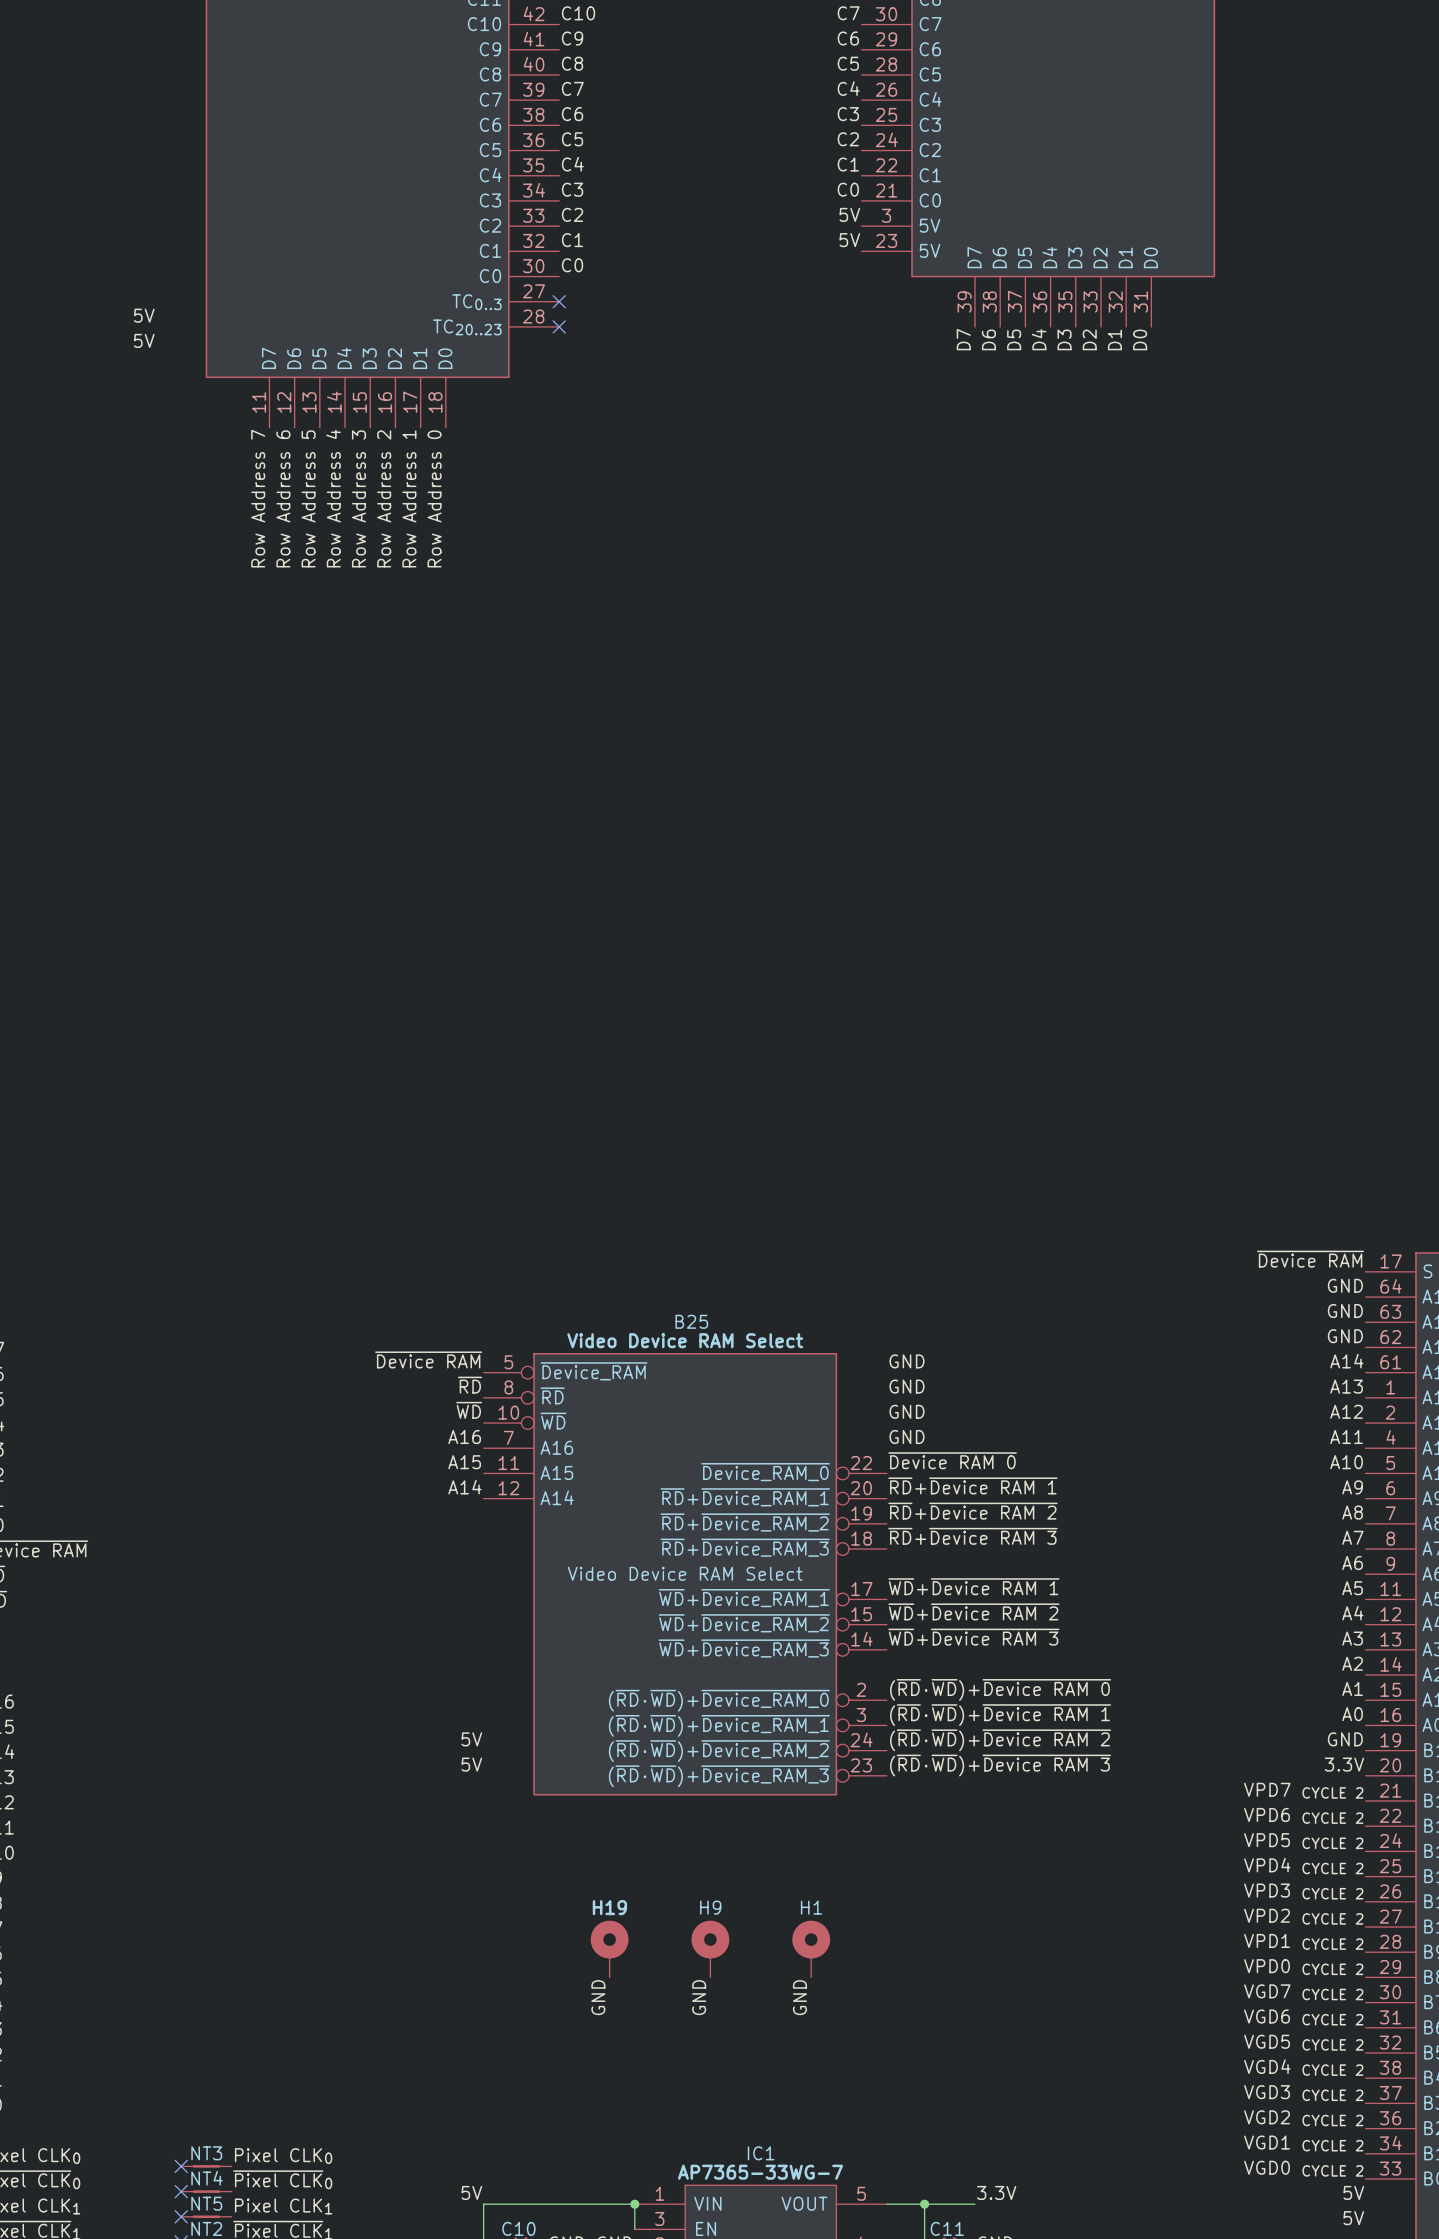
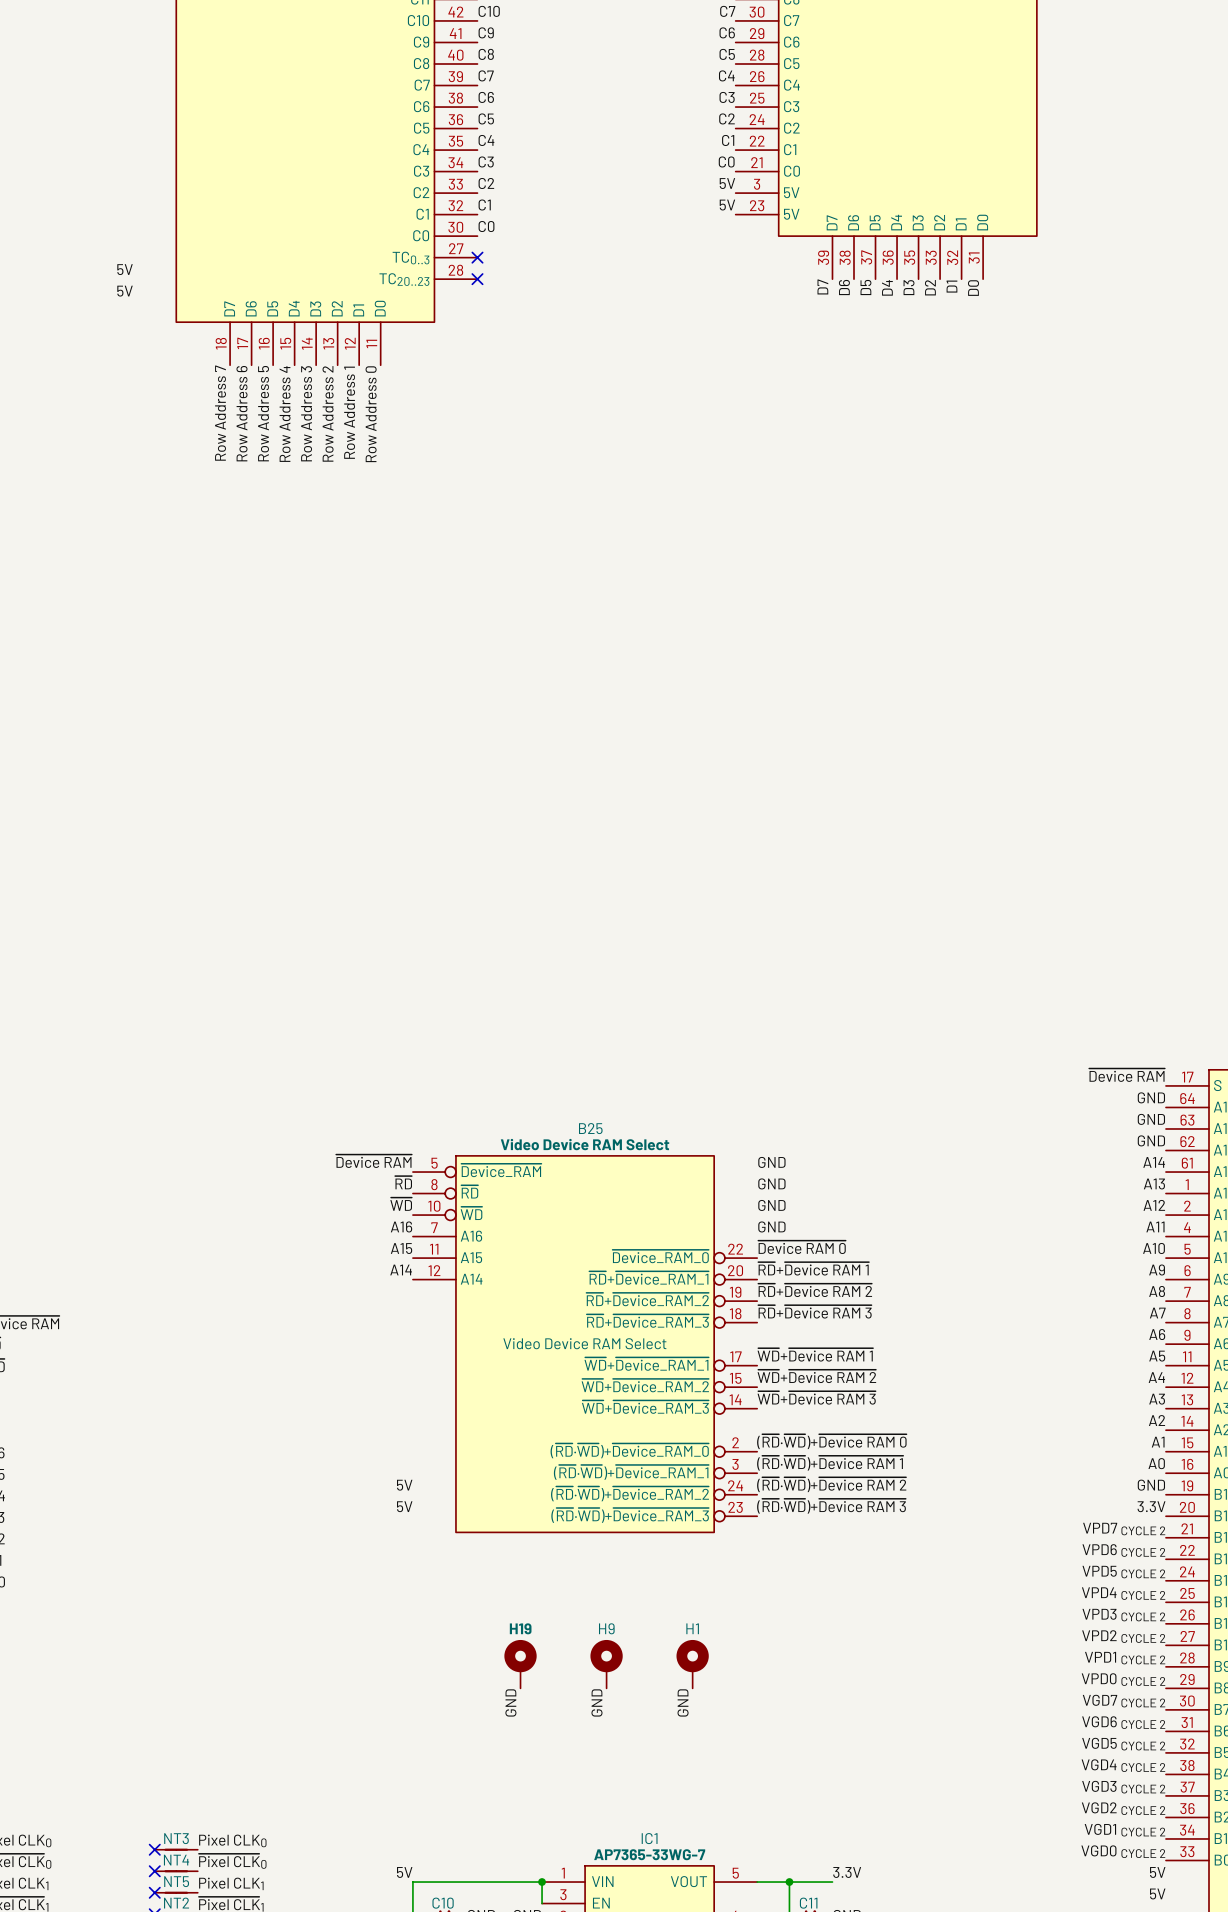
part pin number: 11 (259, 402) -> 18 (221, 343)
part pin number: 12 (284, 402) -> 17 (242, 343)
part pin number: 13 (309, 402) -> 16 (264, 343)
part pin number: 14 (334, 402) -> 15 (285, 343)
part pin number: 15 (359, 402) -> 14 (307, 343)
part pin number: 16 (385, 402) -> 13 (328, 343)
part pin number: 17 (410, 402) -> 12 (350, 343)
part pin number: 18 (435, 402) -> 11 (371, 343)

